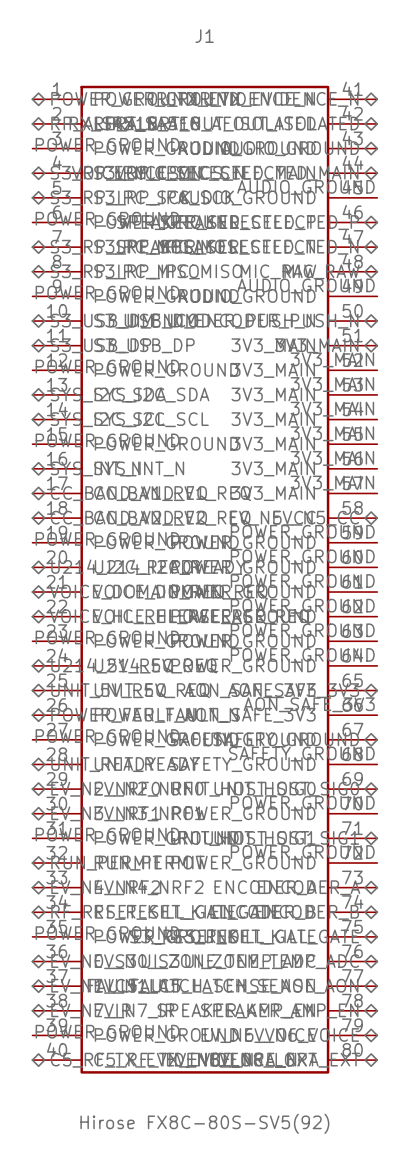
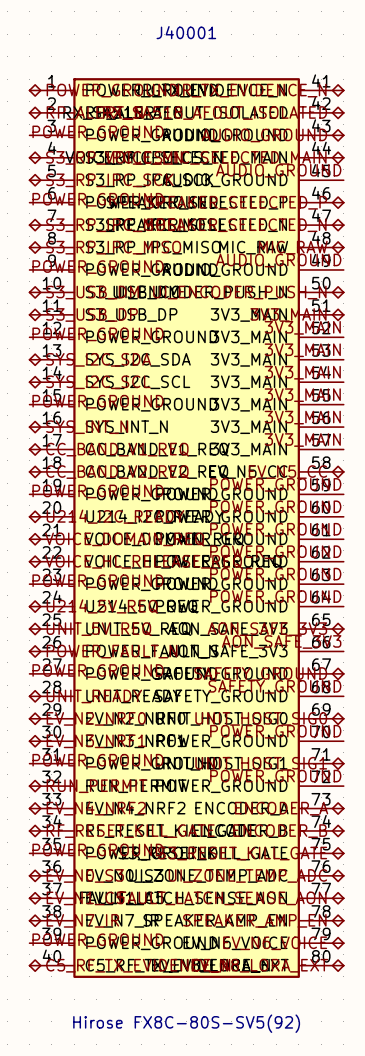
J1 name: J1 (204, 36) -> J40001 (186, 32)

